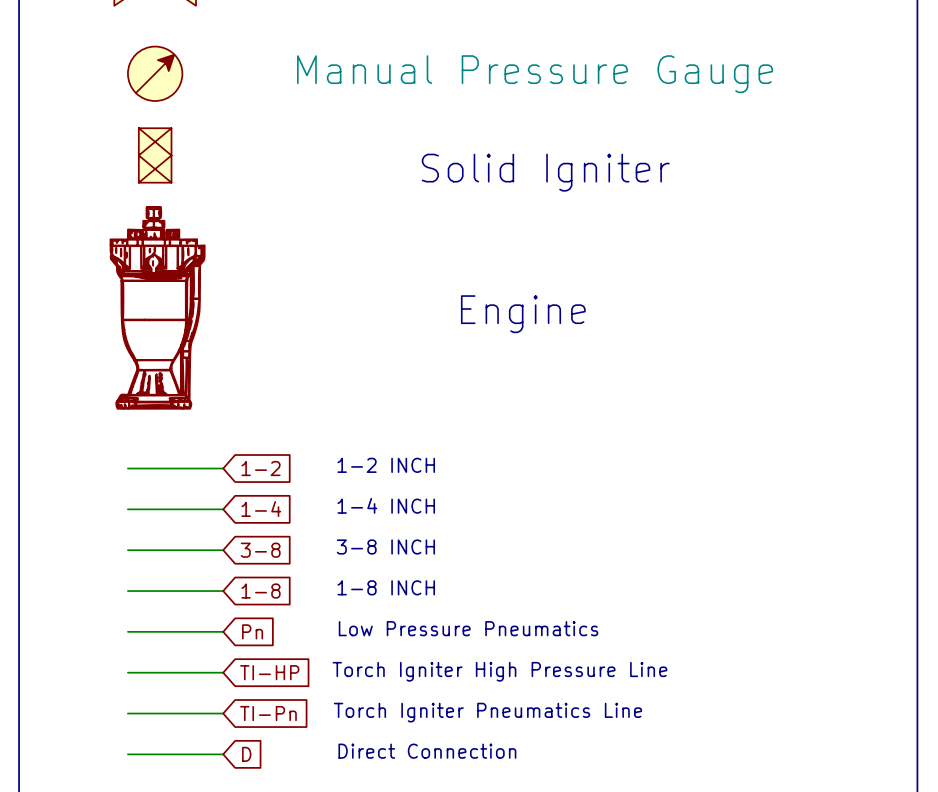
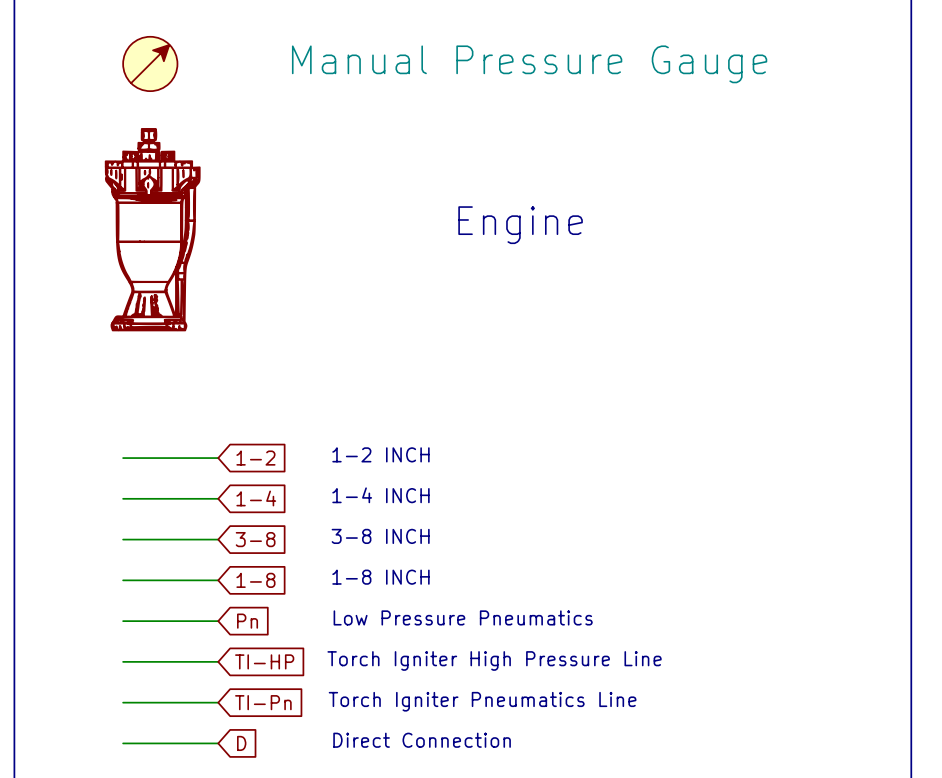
part: (155, 155) -> none
text: Solid Igniter (545, 172) -> none
part position: (157, 307) -> (152, 229)
text position: Engine (523, 314) -> Engine (520, 225)

